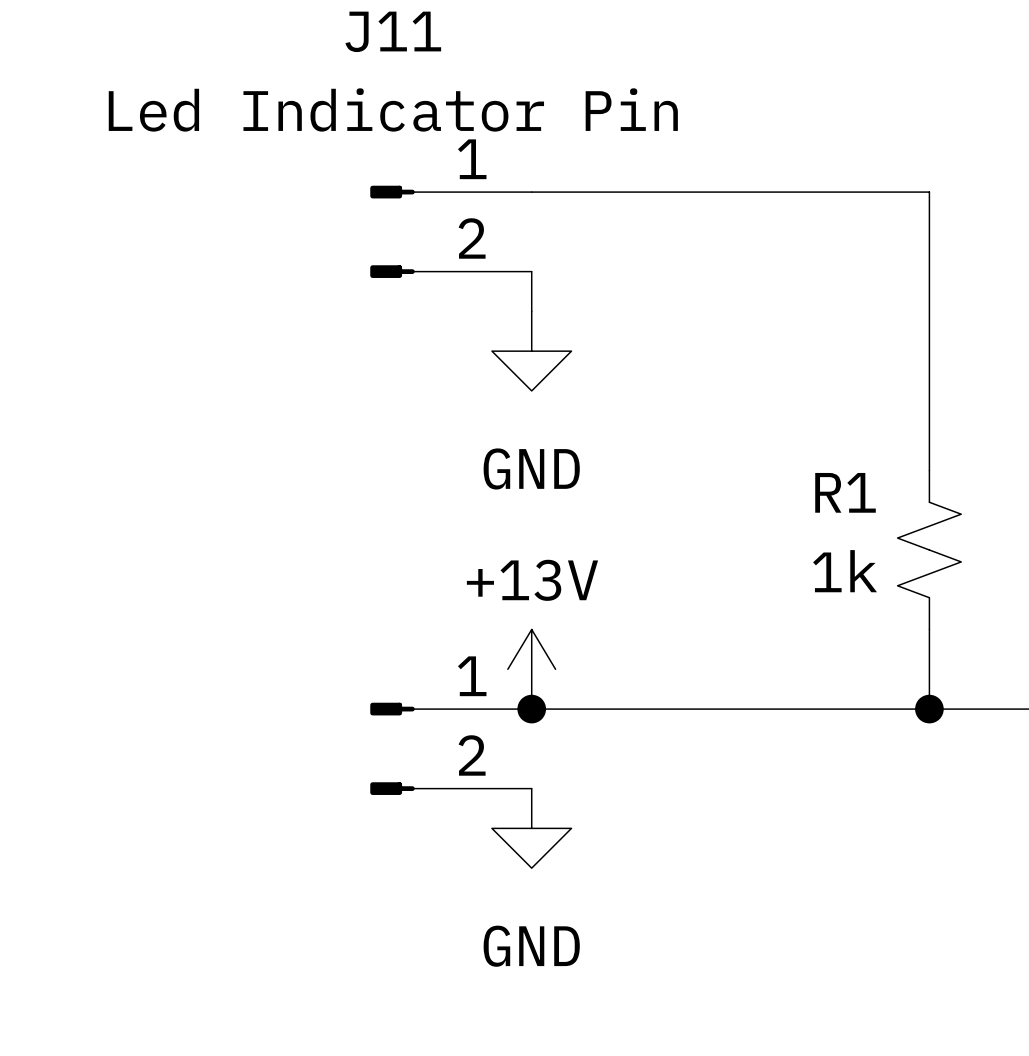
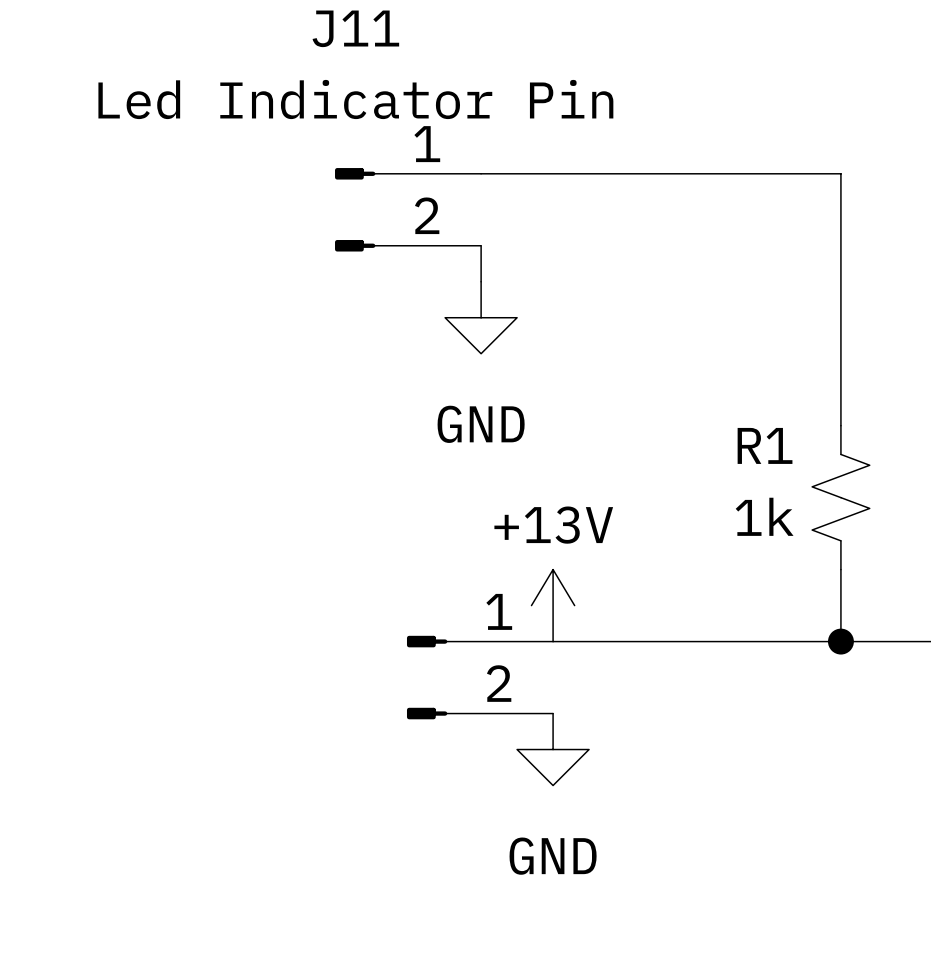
power symbol position: +13V (531, 669) -> +13V (553, 605)
junction: (531, 709) -> none
part position: (450, 748) -> (480, 677)
power symbol position: GND (531, 828) -> GND (553, 749)

